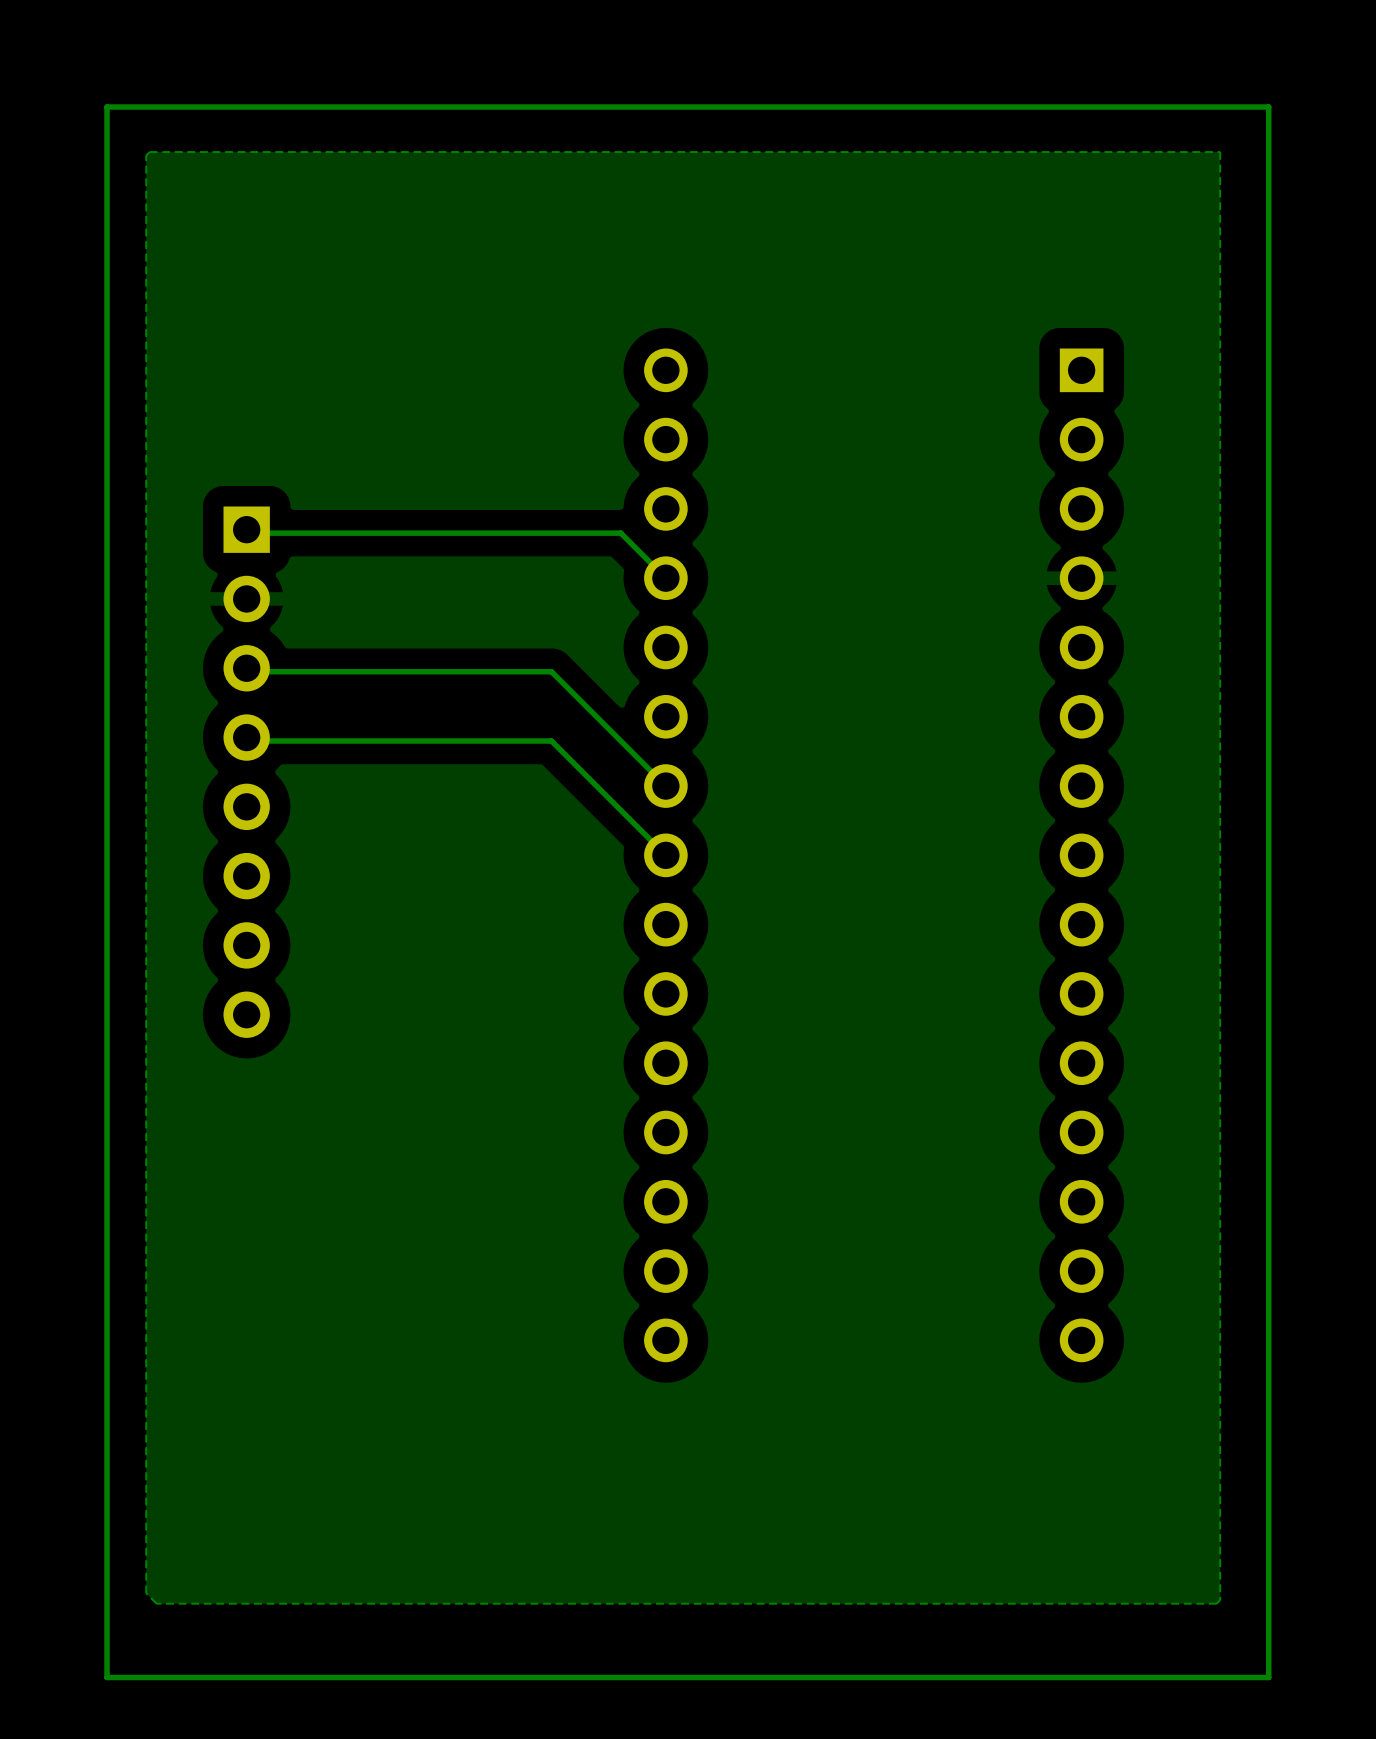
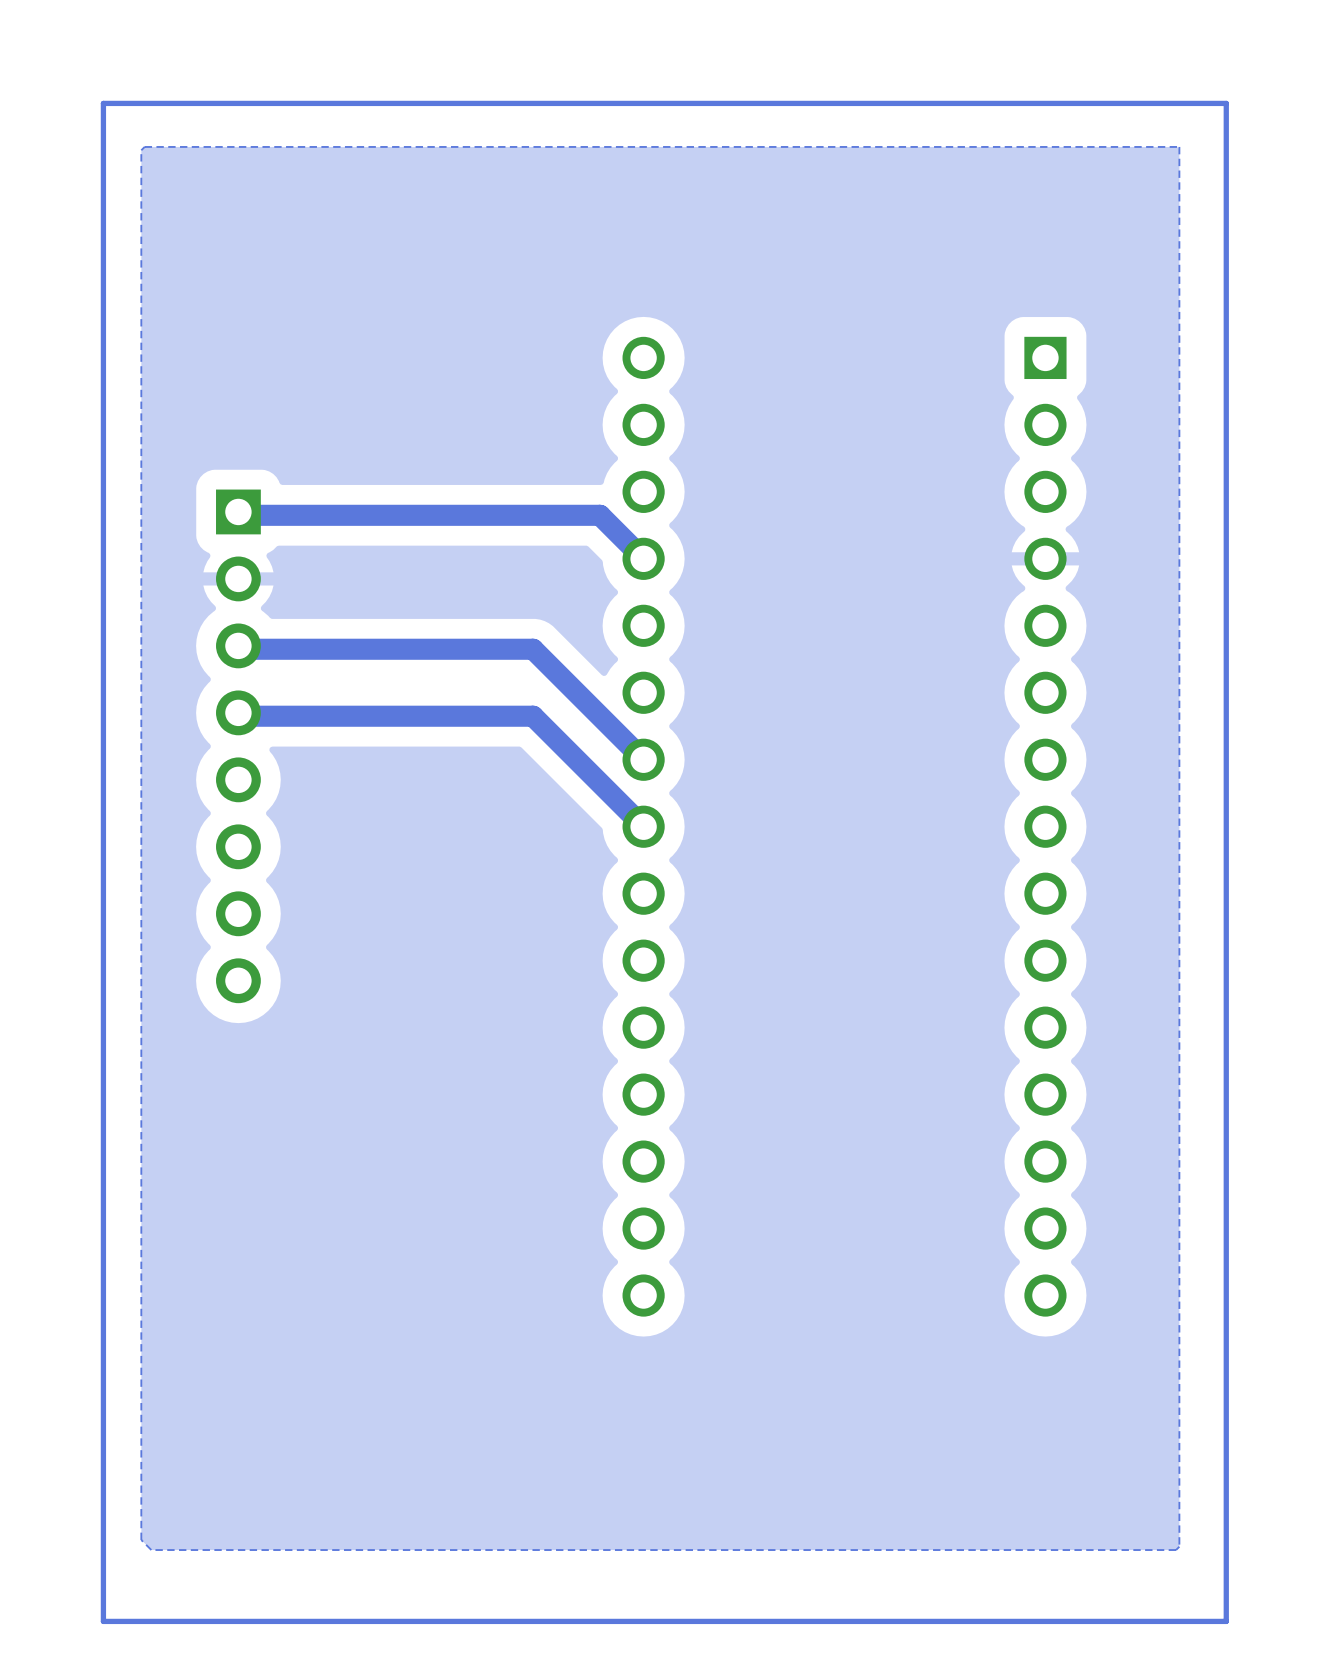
track width: thin (246, 533) (620, 533) (665, 578) -> thick (238, 515) (600, 515) (643, 558)
track width: thin (246, 671) (551, 671) (665, 786) -> thick (238, 649) (533, 649) (643, 759)
track width: thin (246, 741) (551, 741) (665, 855) -> thick (238, 716) (533, 716) (643, 826)

